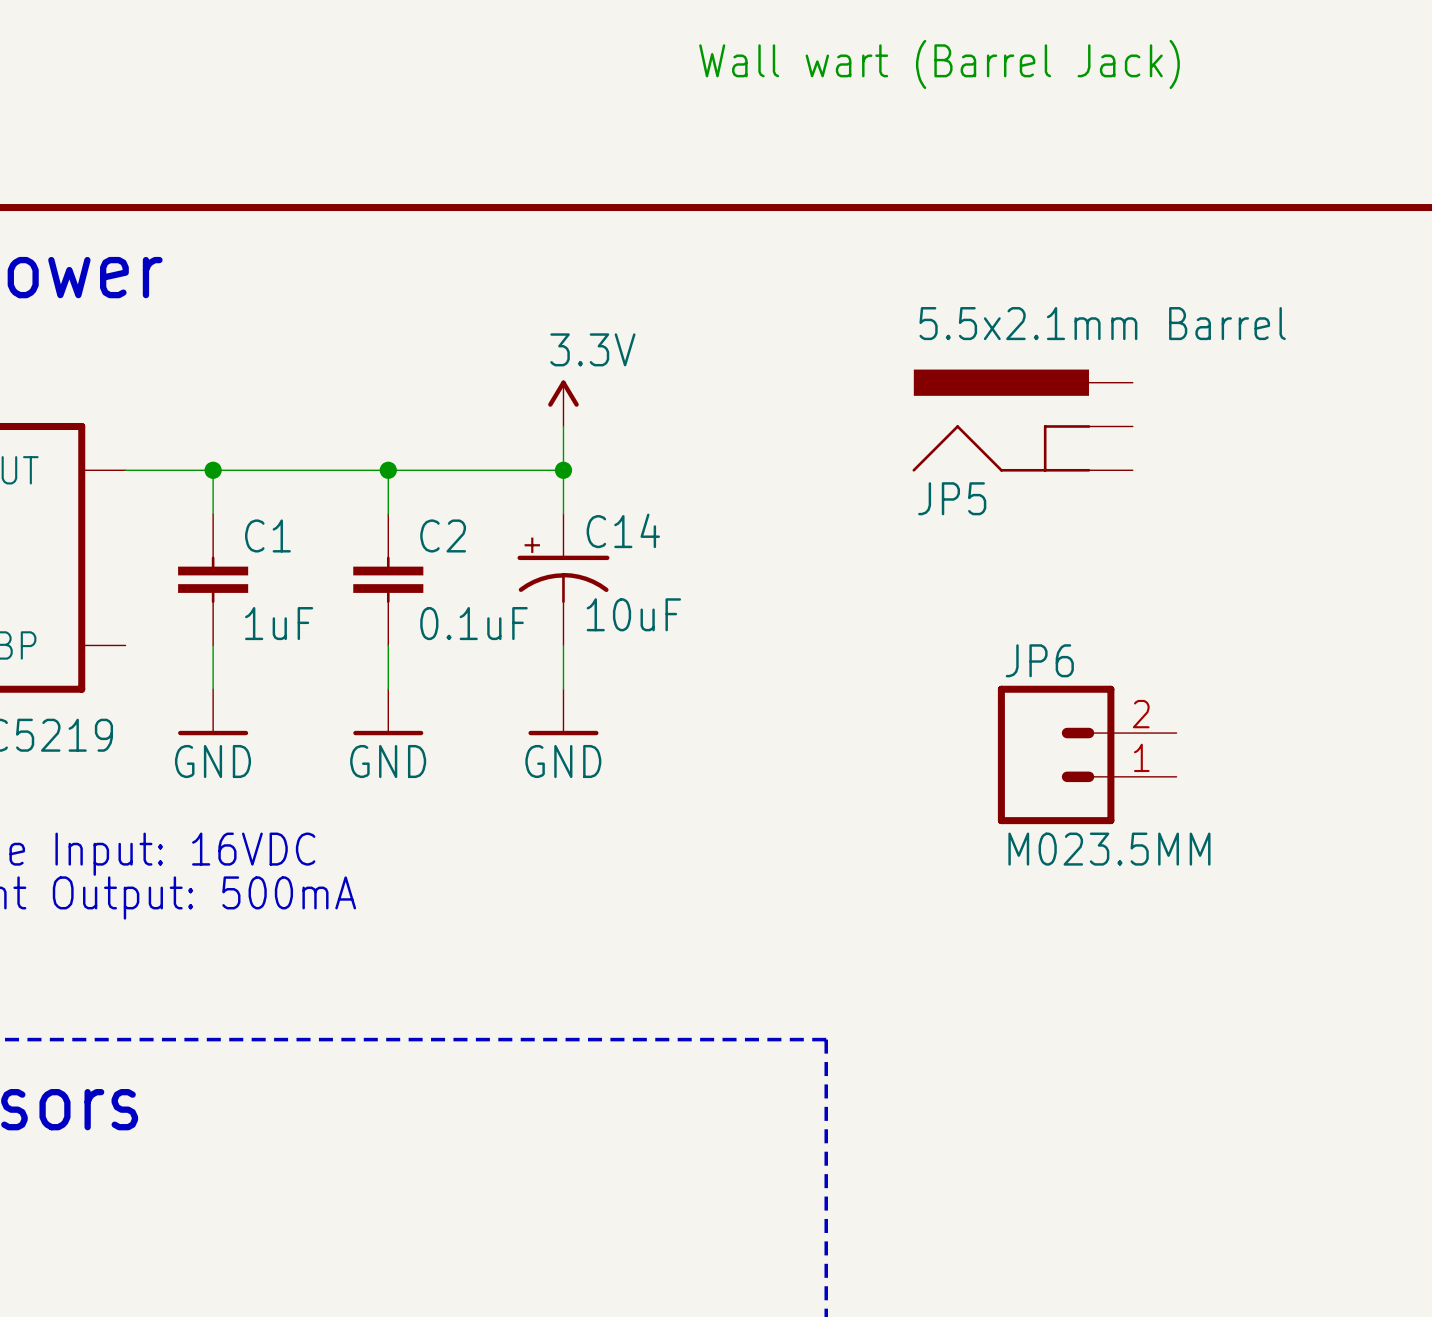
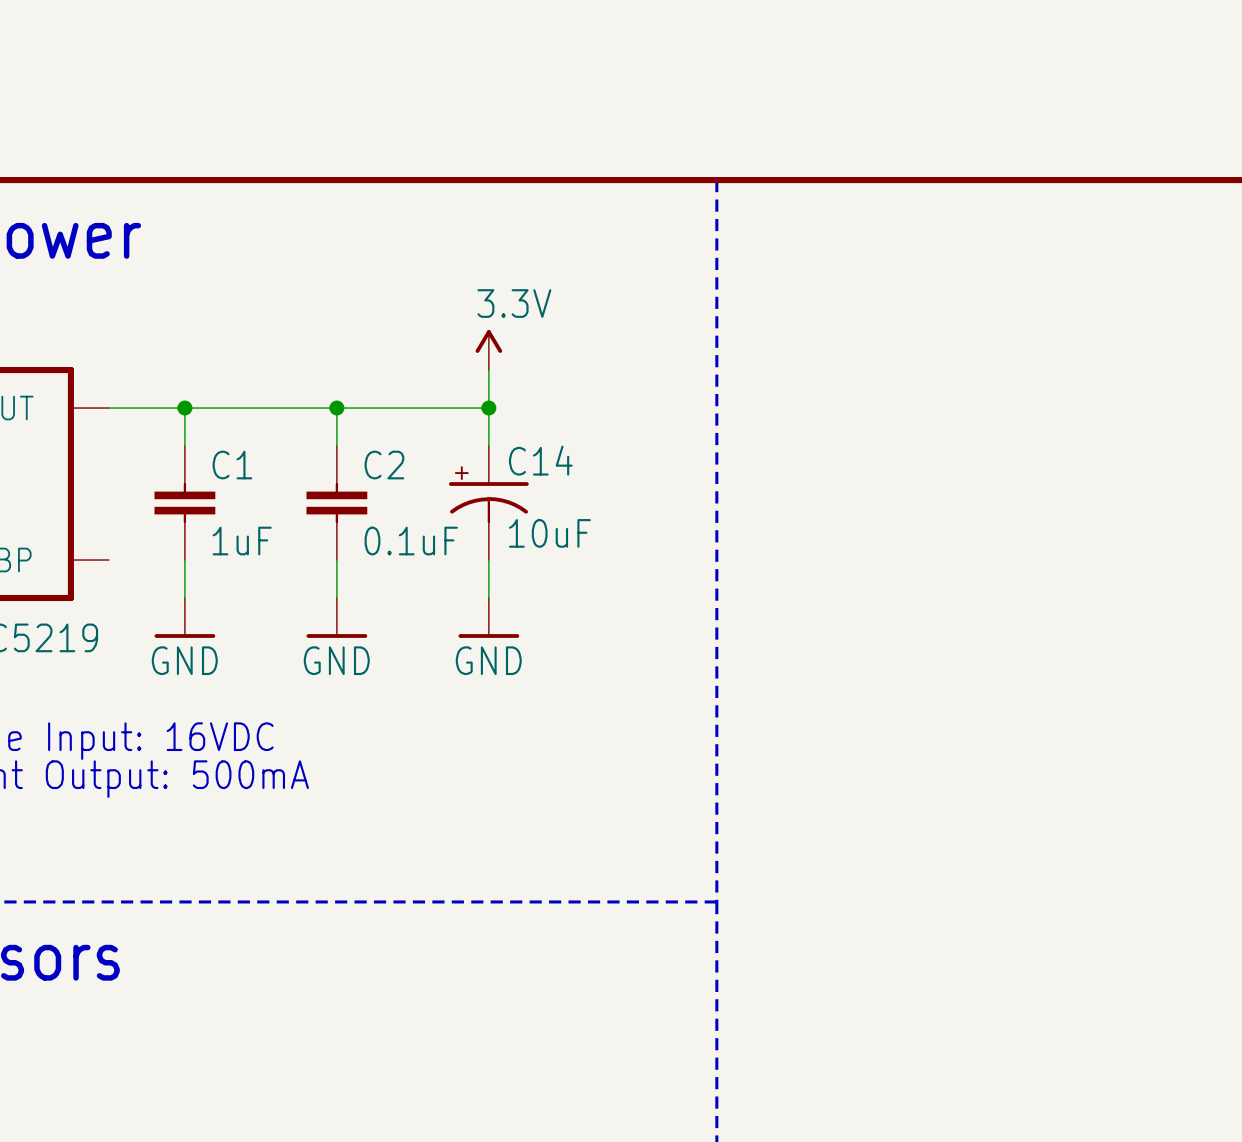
text: Wall wart (Barrel Jack) (939, 64) -> none
line: none -> (716, 180) (716, 901)
JP5: 5.5x2.1mm Barrel (1022, 420) -> none
JP6: M023.5MM (1087, 754) -> none

